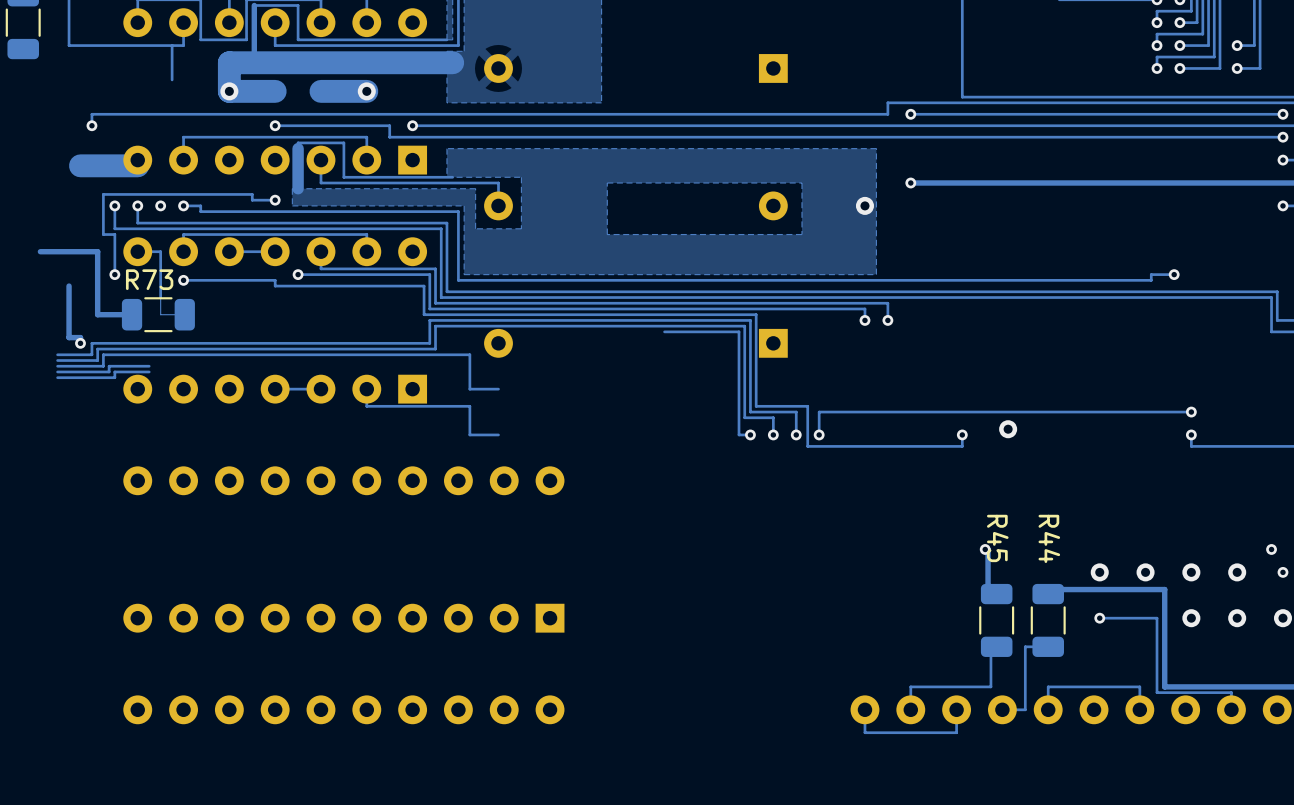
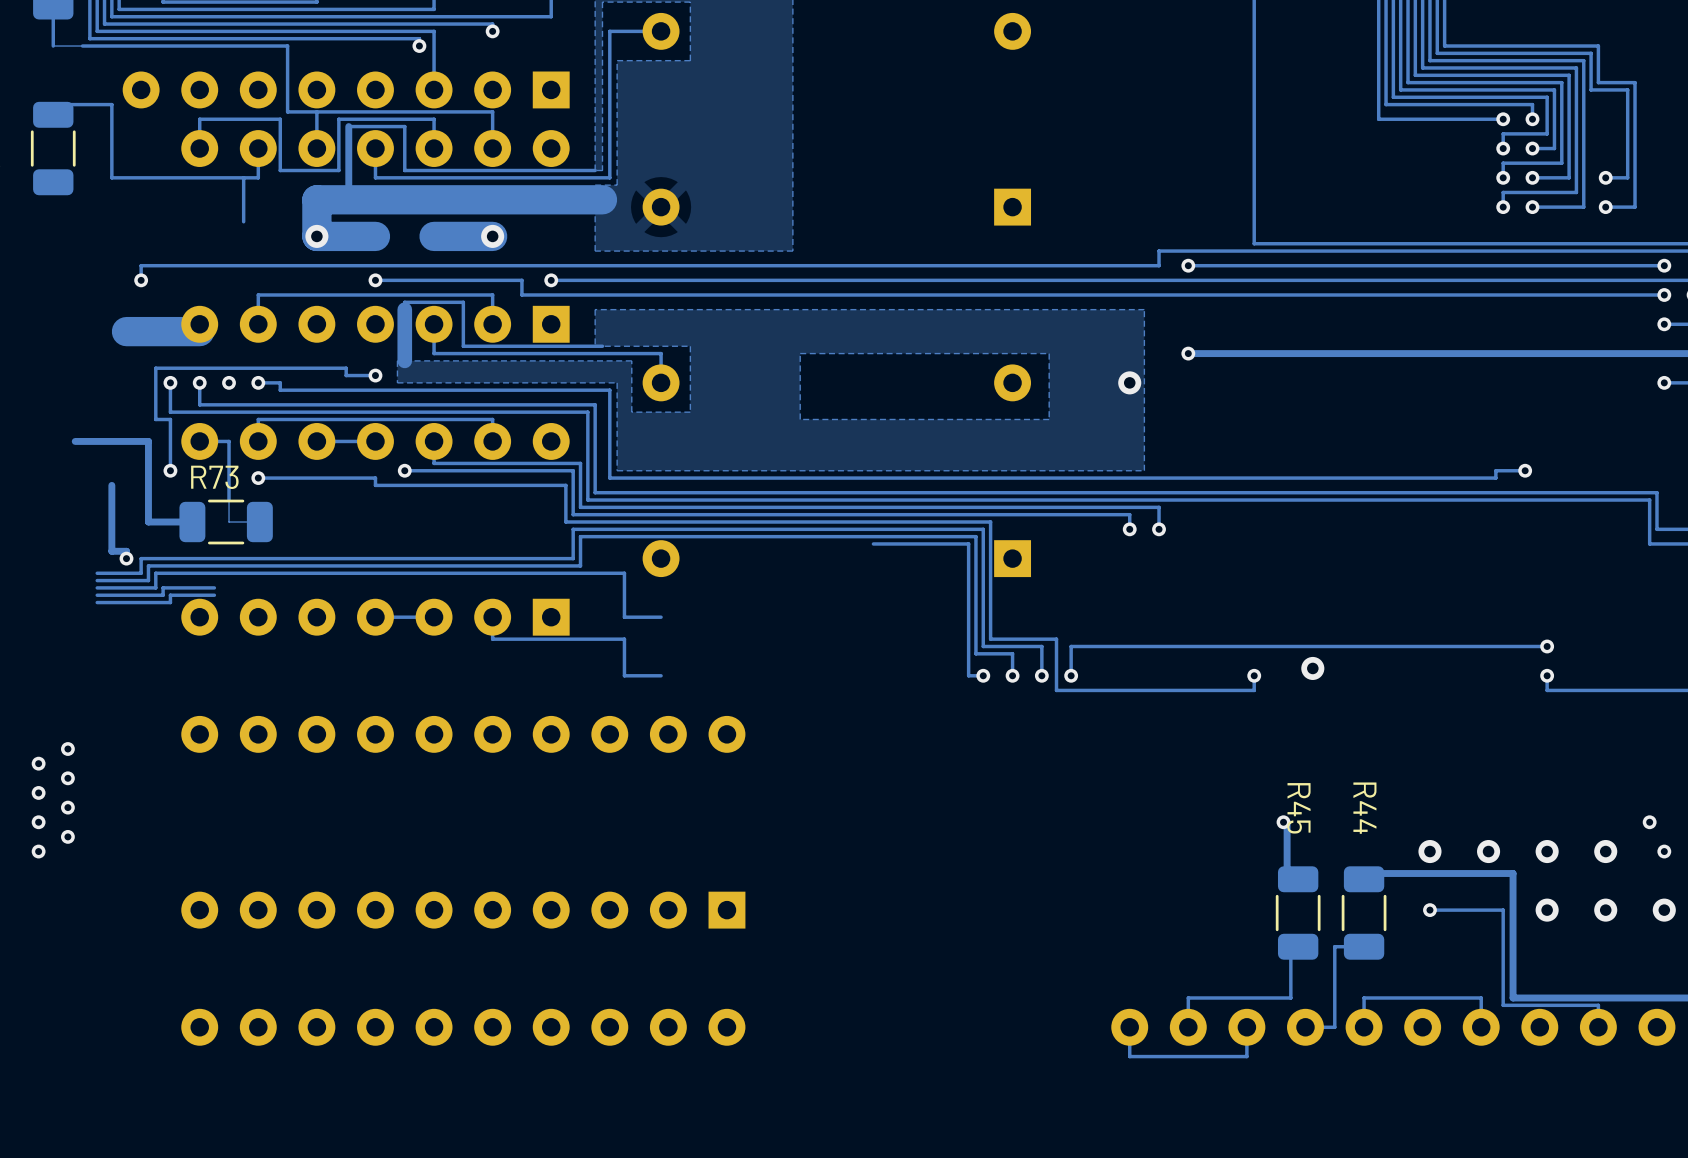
via: none -> (67, 749)
via: none -> (38, 763)
via: none -> (67, 778)
via: none -> (38, 792)
via: none -> (67, 807)
via: none -> (38, 822)
via: none -> (67, 836)
via: none -> (38, 851)

